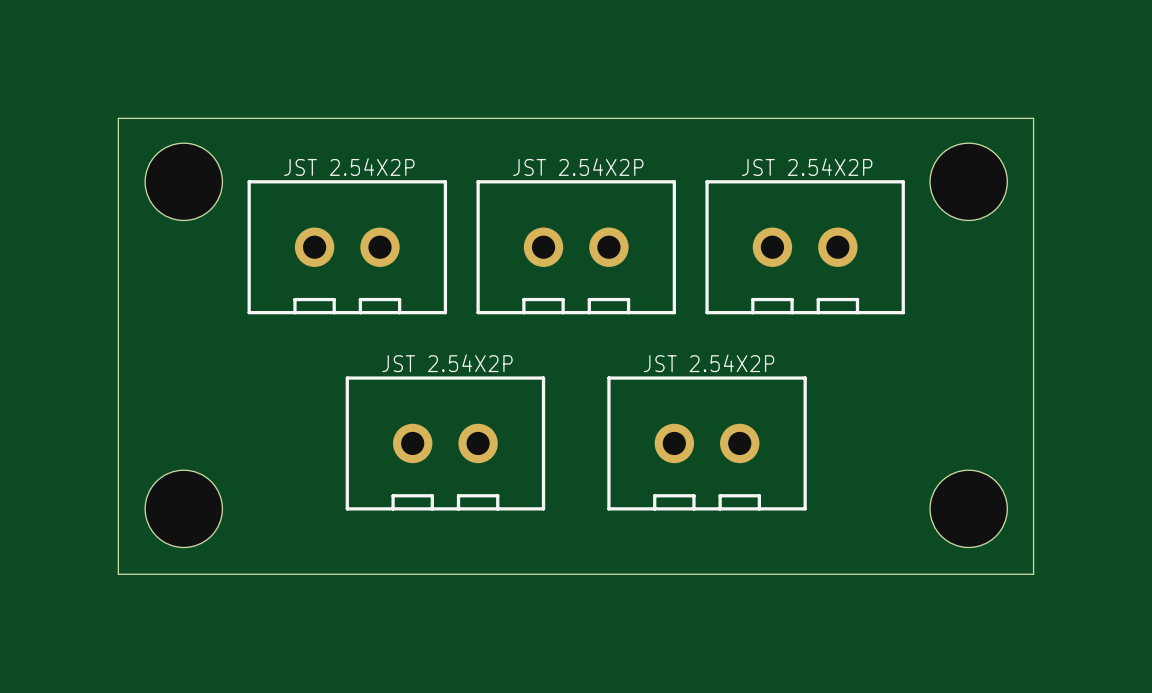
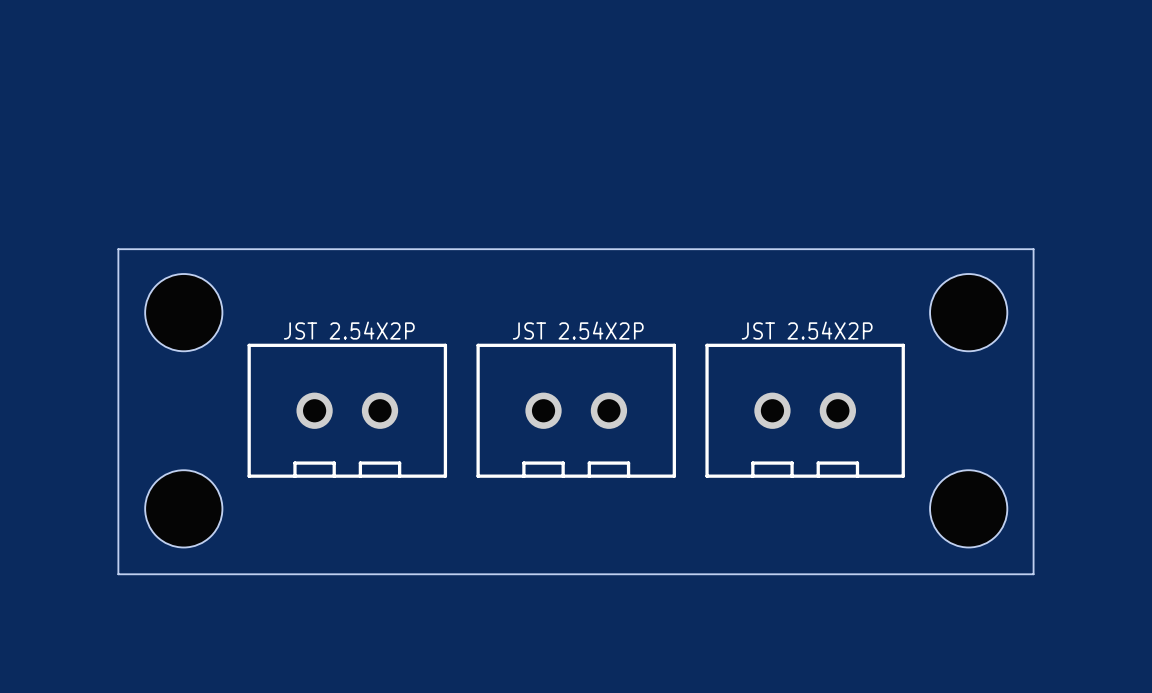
hole position: (183, 181) -> (183, 312)
hole position: (968, 181) -> (968, 312)
part: (347, 247) -> none
part: (576, 247) -> none
part: (805, 247) -> none
board edge: (118, 249) (118, 118) (1033, 118) (1033, 249) -> (118, 249) (1033, 249)
part: none -> (347, 410)
part: none -> (576, 410)
part: none -> (805, 410)
part: (445, 443) -> none
part: (707, 443) -> none

